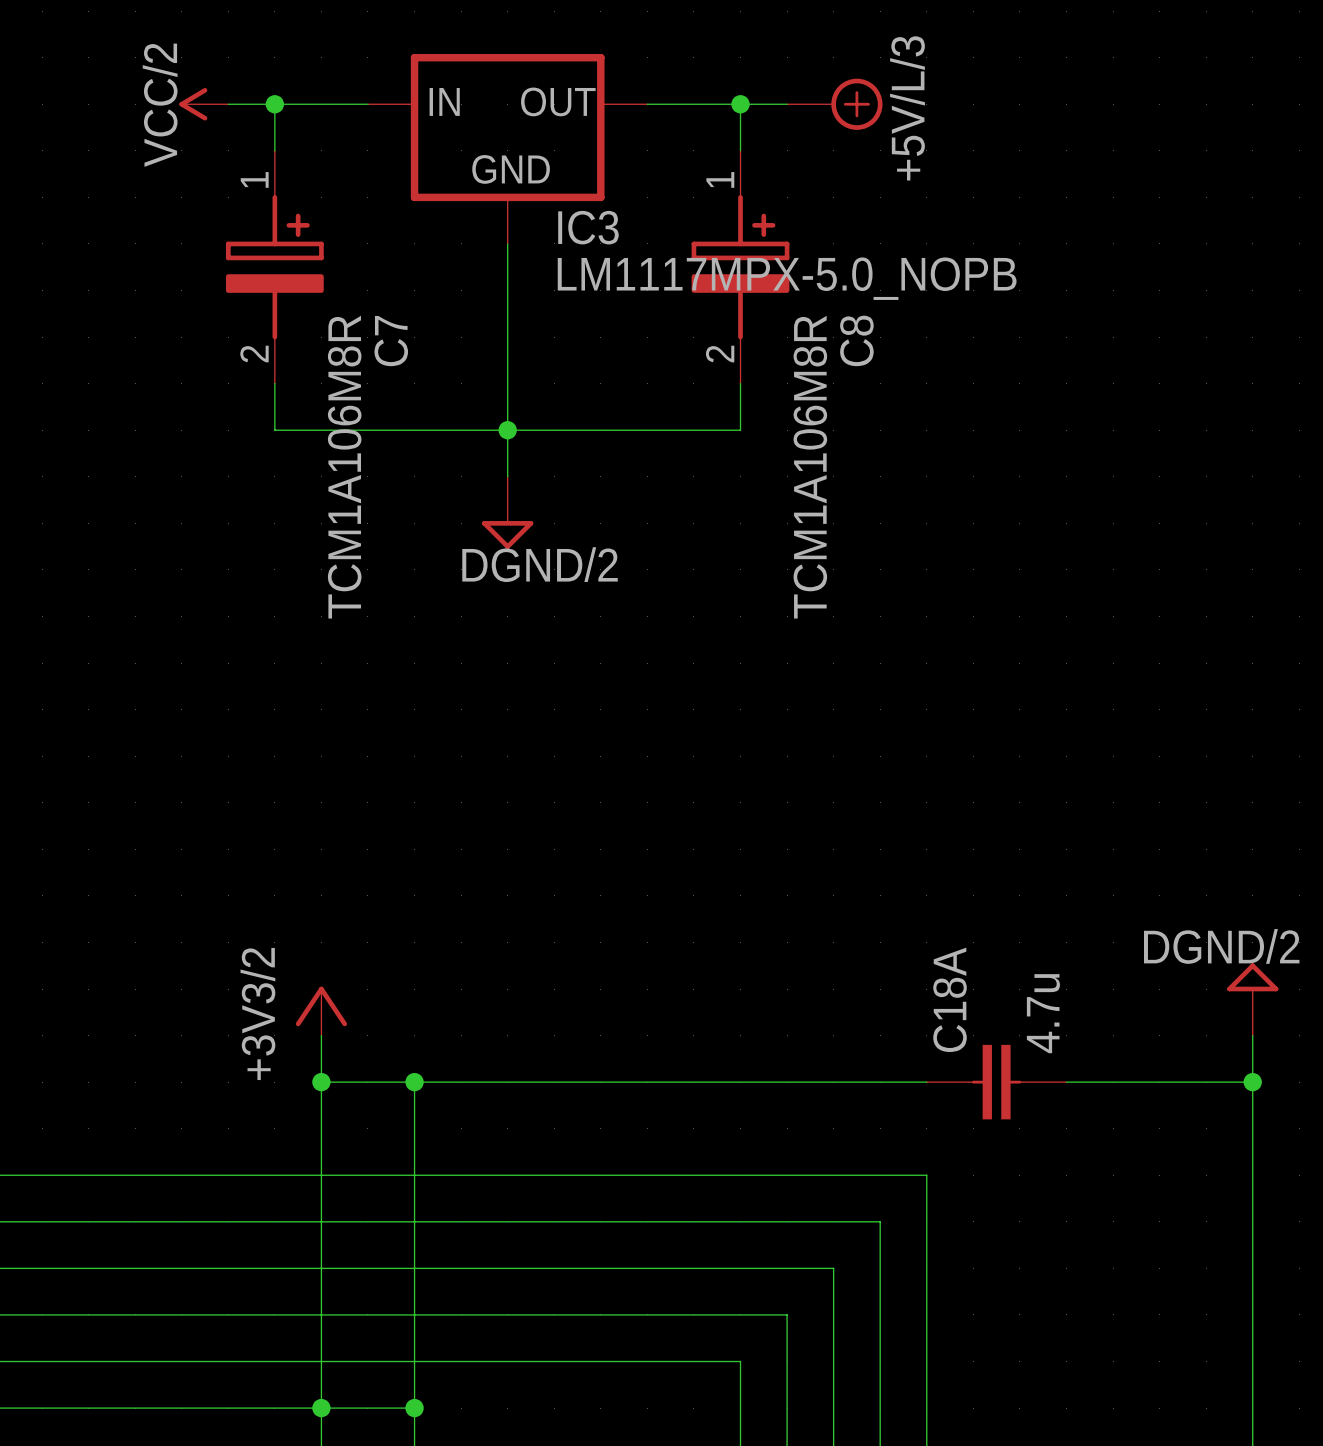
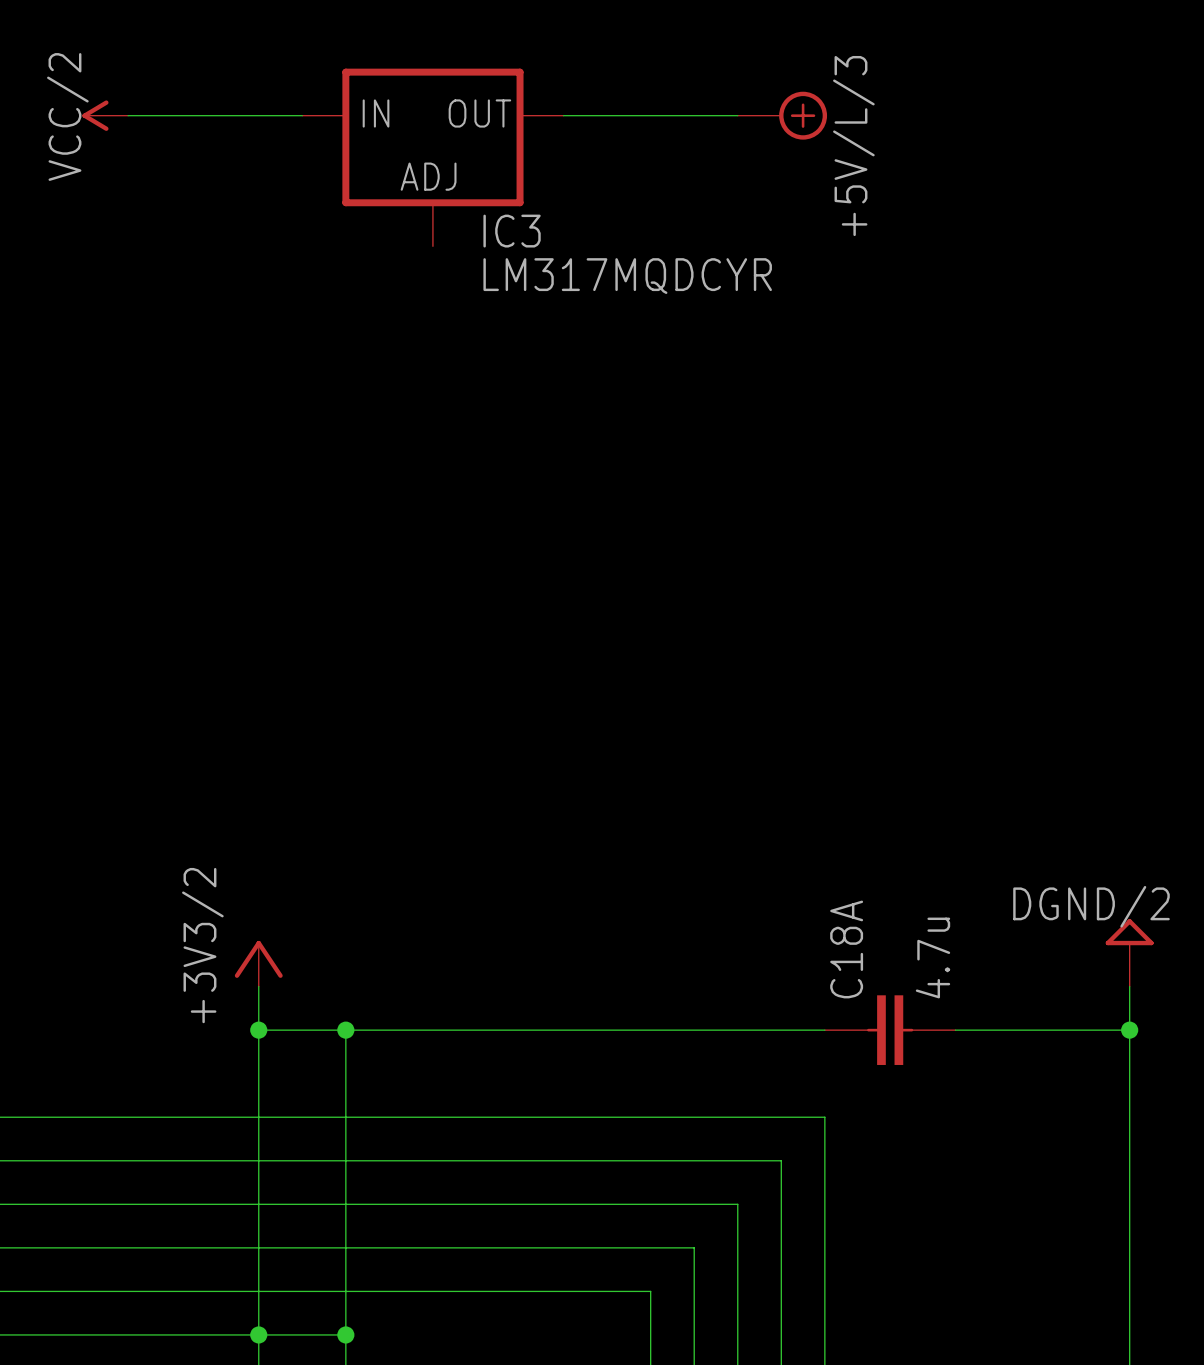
power symbol position: VCC/2 (203, 104) -> VCC/2 (105, 115)
wire: (274, 104) (274, 150) -> none
junction: (274, 104) -> none
wire: (740, 104) (740, 150) -> none
junction: (740, 104) -> none
power symbol position: +5V/L/3 (834, 104) -> +5V/L/3 (782, 115)
IC3 text: GND (511, 169) -> ADJ (428, 176)
wire: (507, 243) (507, 476) -> none
C7: TCM1A106M8R (274, 267) -> none
C8: TCM1A106M8R (740, 267) -> none
IC3 value: LM1117MPX-5.0_NOPB (787, 278) -> LM317MQDCYR (627, 276)
wire: (274, 383) (274, 430) (740, 430) (740, 383) -> none
junction: (507, 430) -> none
power symbol: DGND/2 (507, 512) -> none

